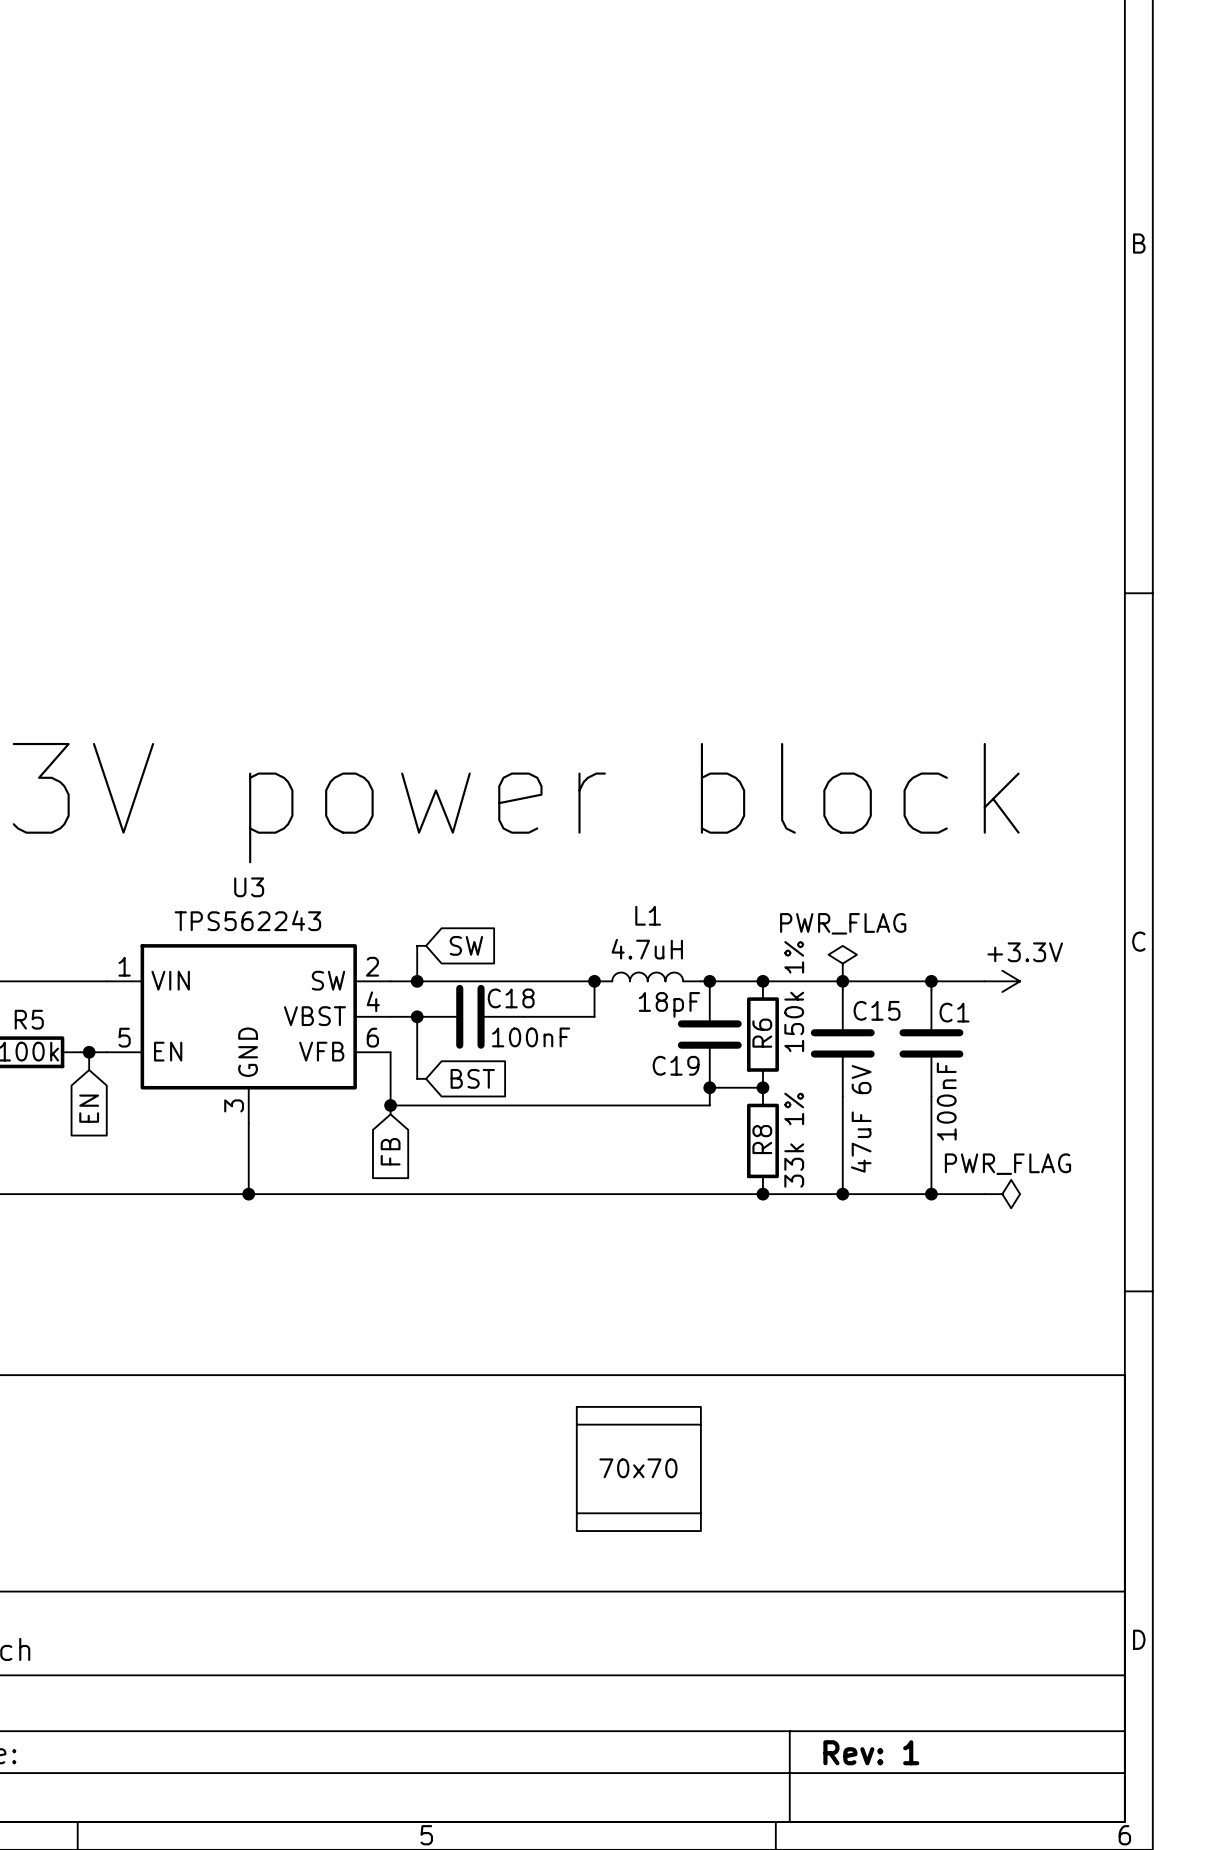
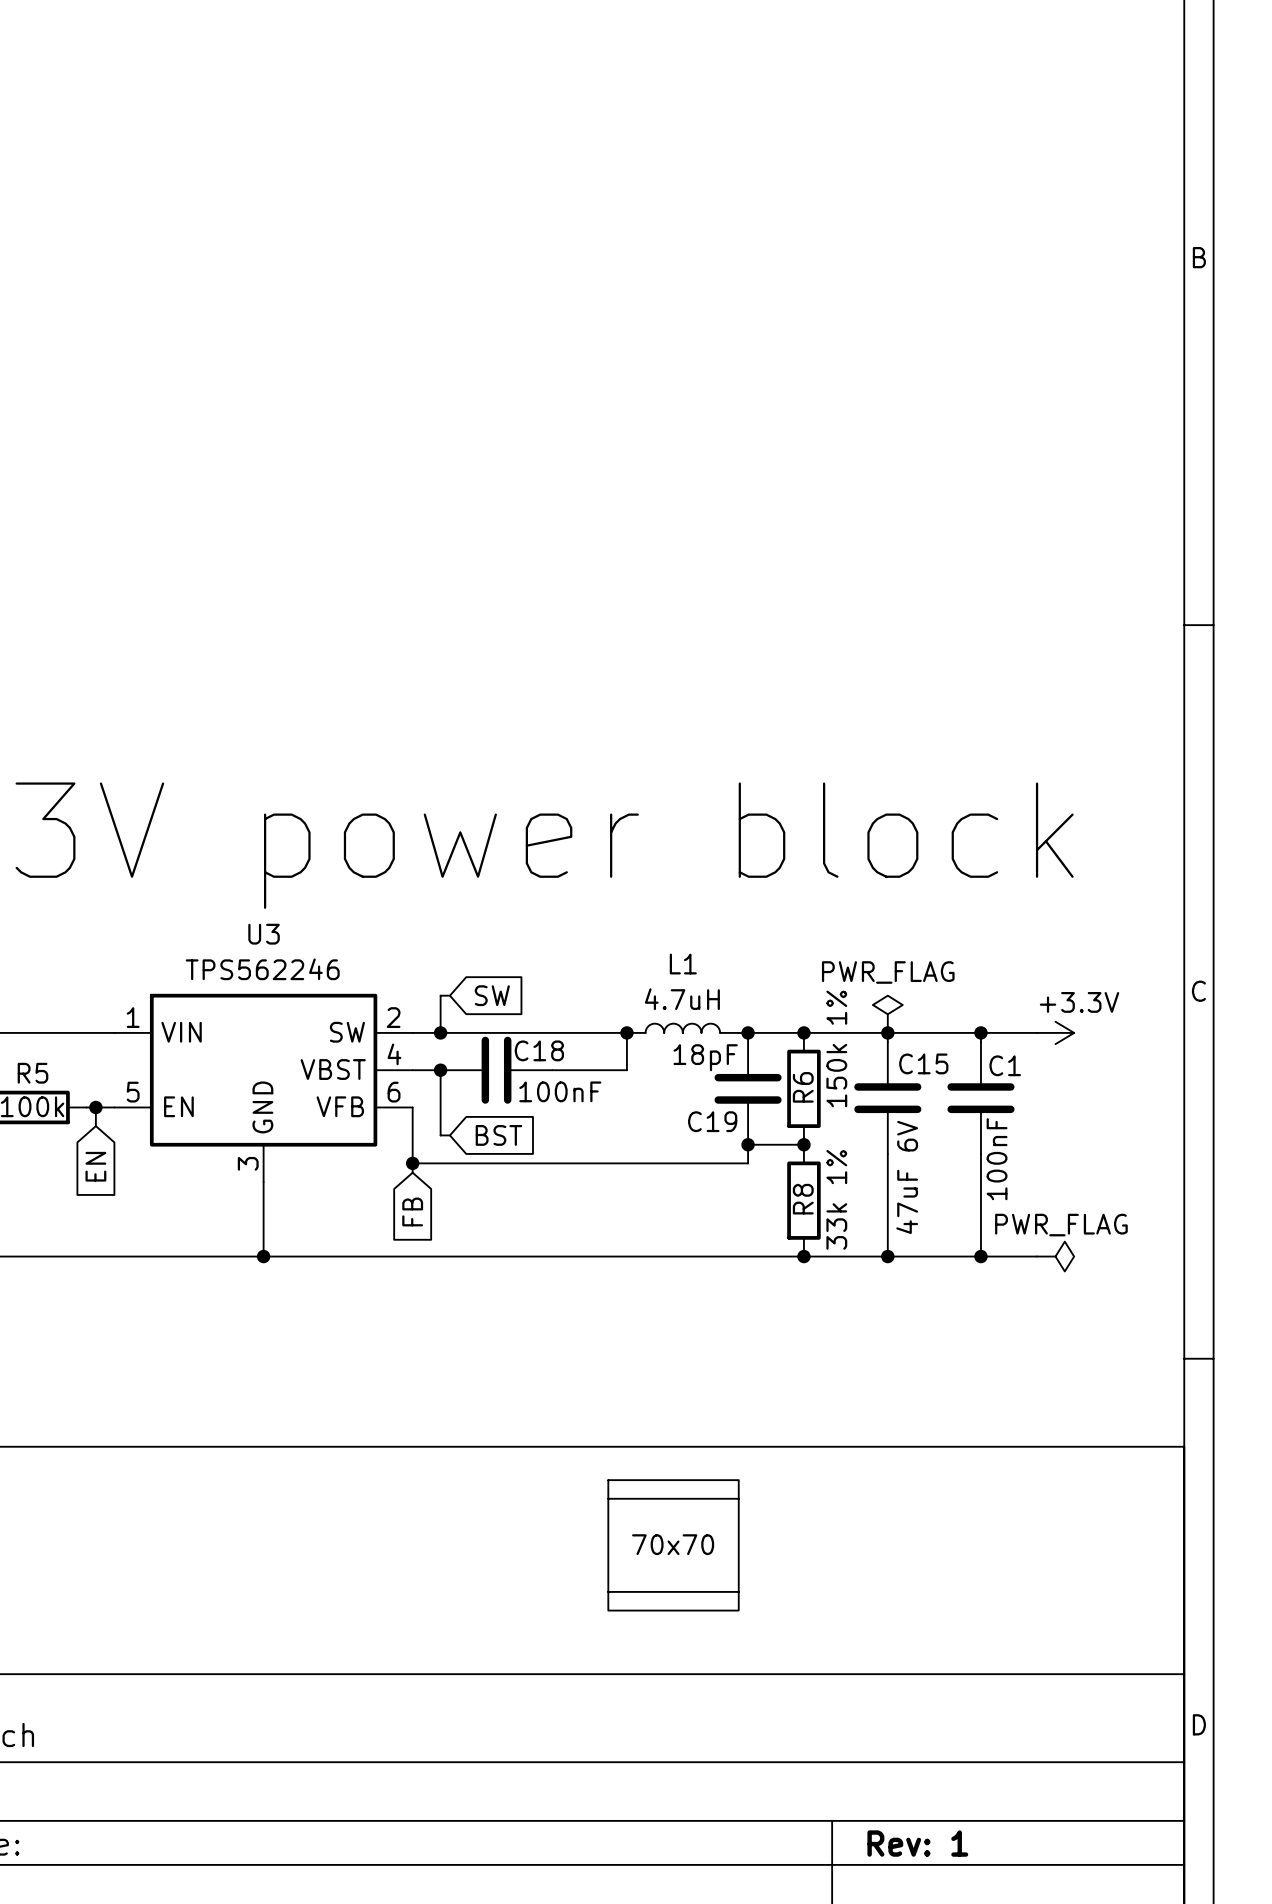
U3 value: TPS562243 (247, 920) -> TPS562246 (262, 969)

